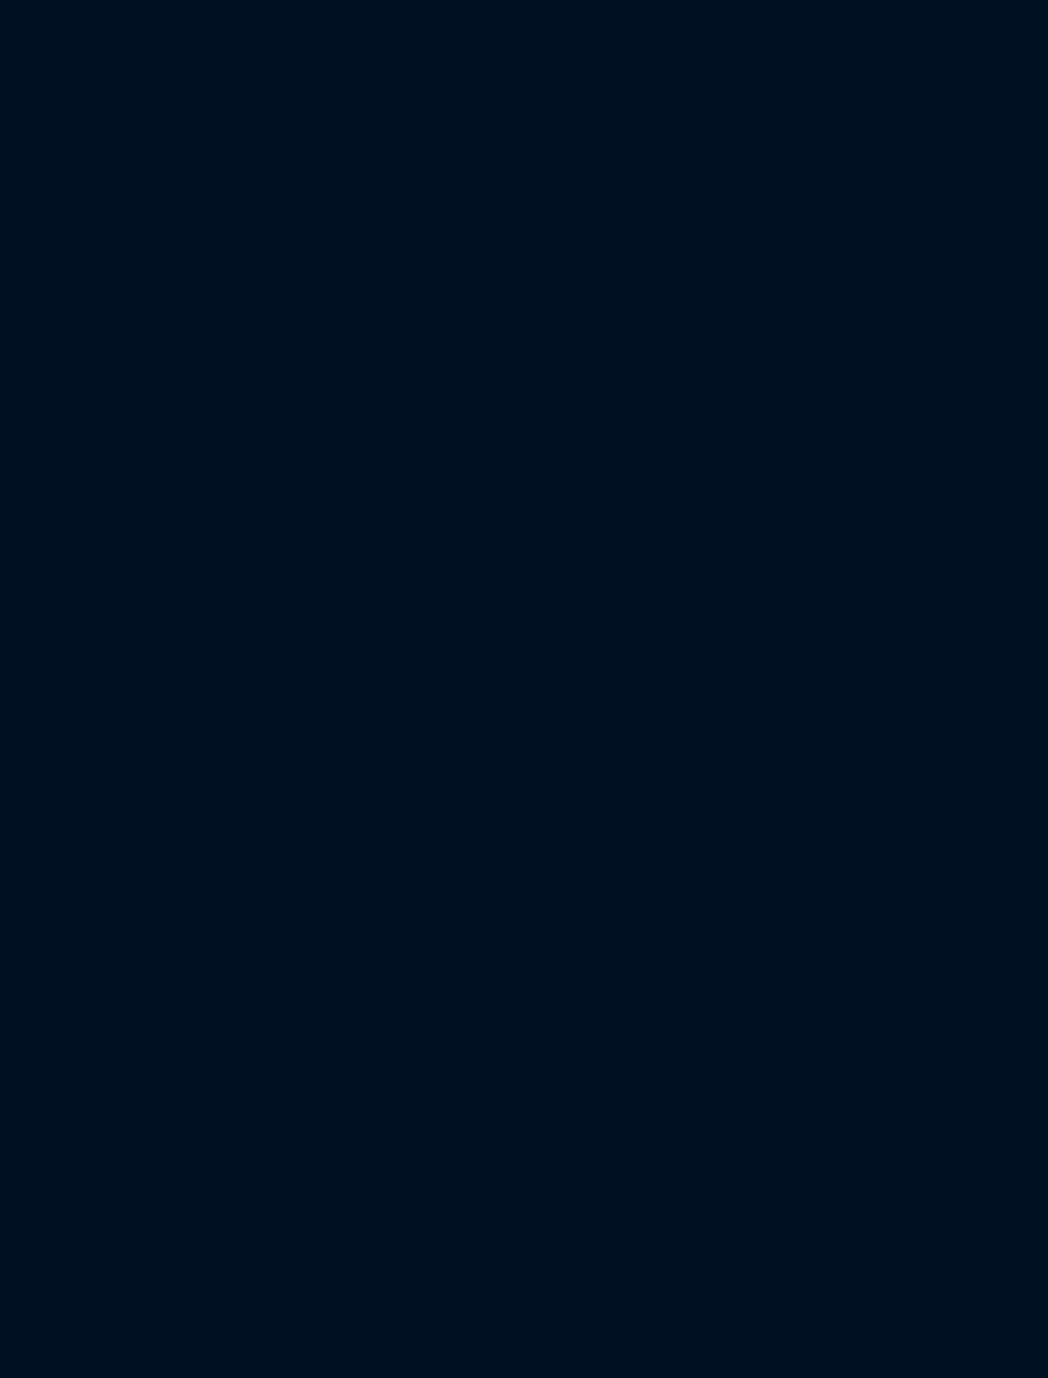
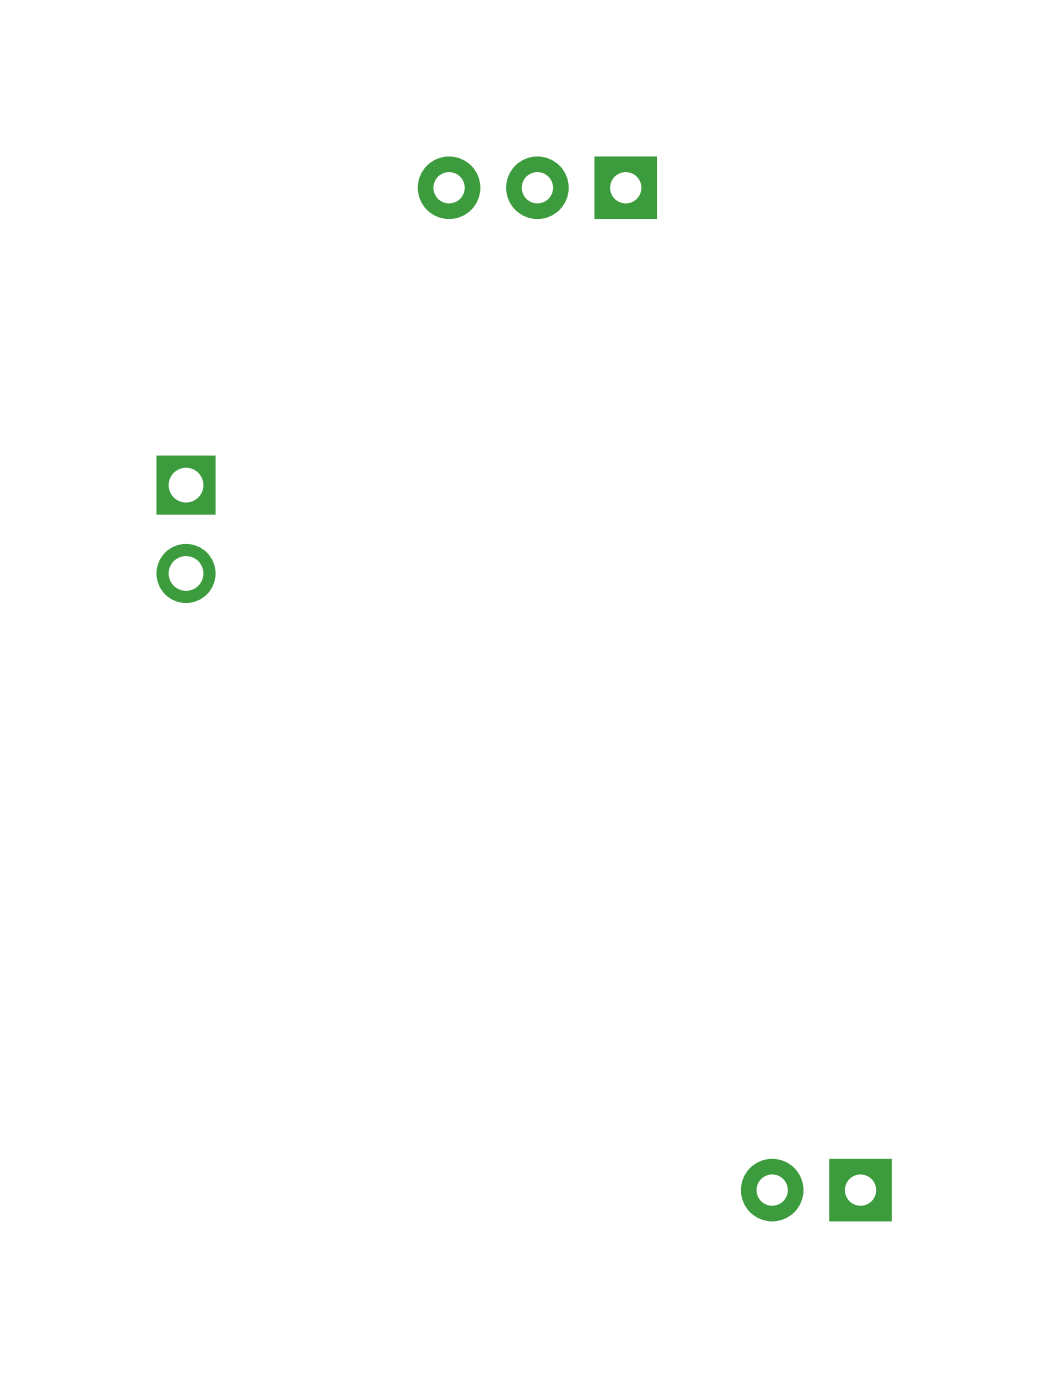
part: none -> (537, 187)
part: none -> (186, 529)
part: none -> (816, 1190)

